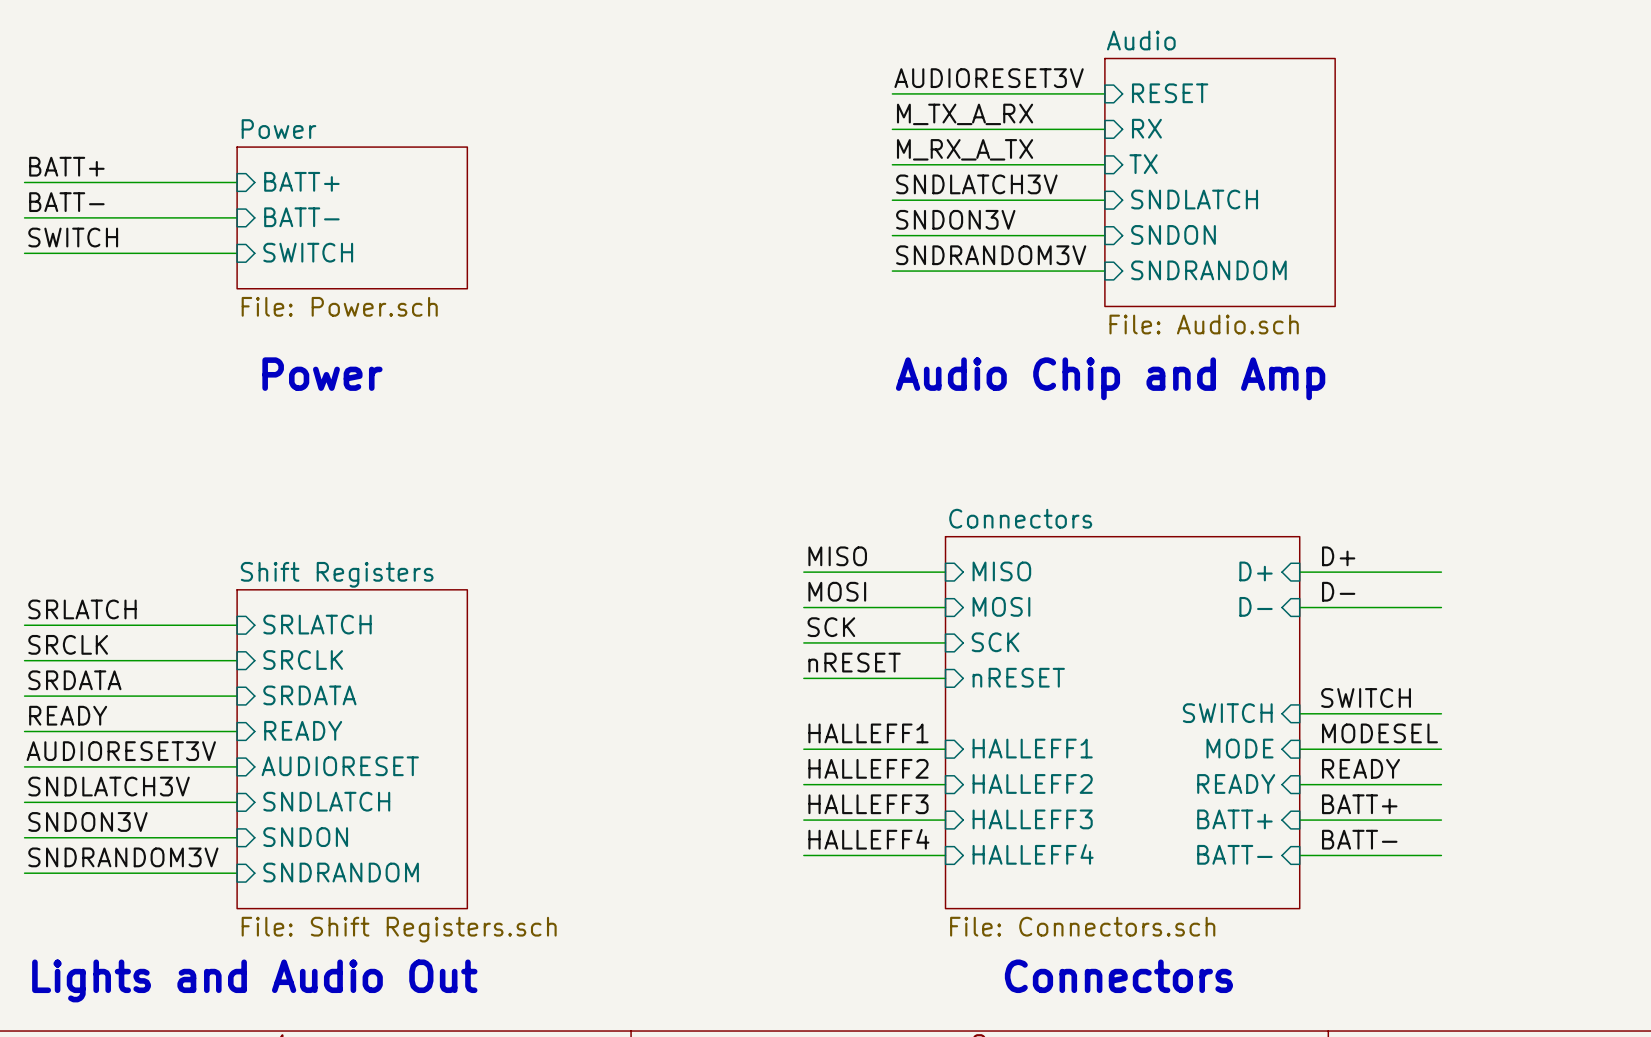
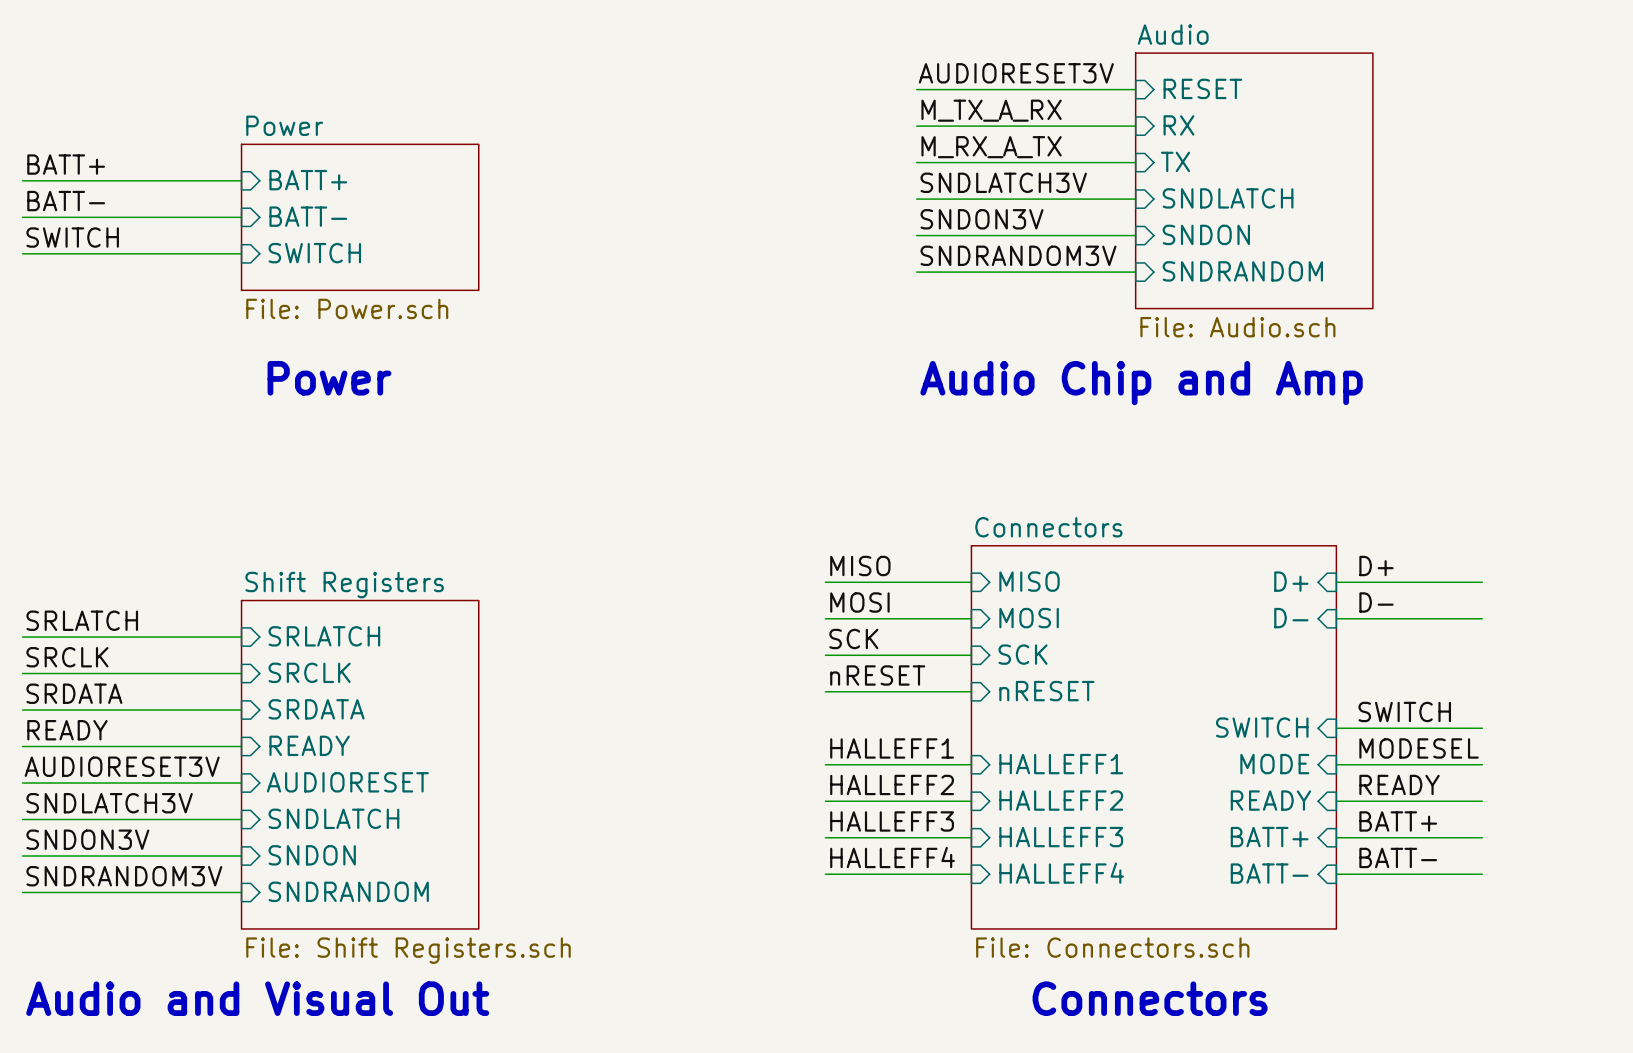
text: Lights and Audio Out (254, 980) -> Audio and Visual Out (257, 998)

